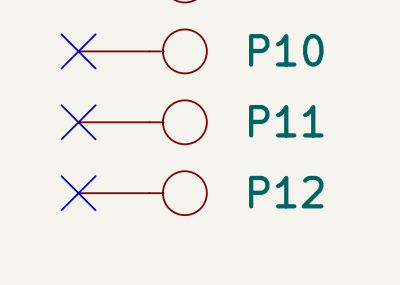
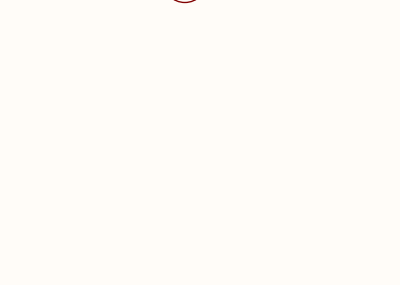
no-connect mark: (78, 51) -> none
P10: (142, 51) -> none
no-connect mark: (78, 122) -> none
P11: (142, 122) -> none
no-connect mark: (78, 193) -> none
P12: (142, 193) -> none

